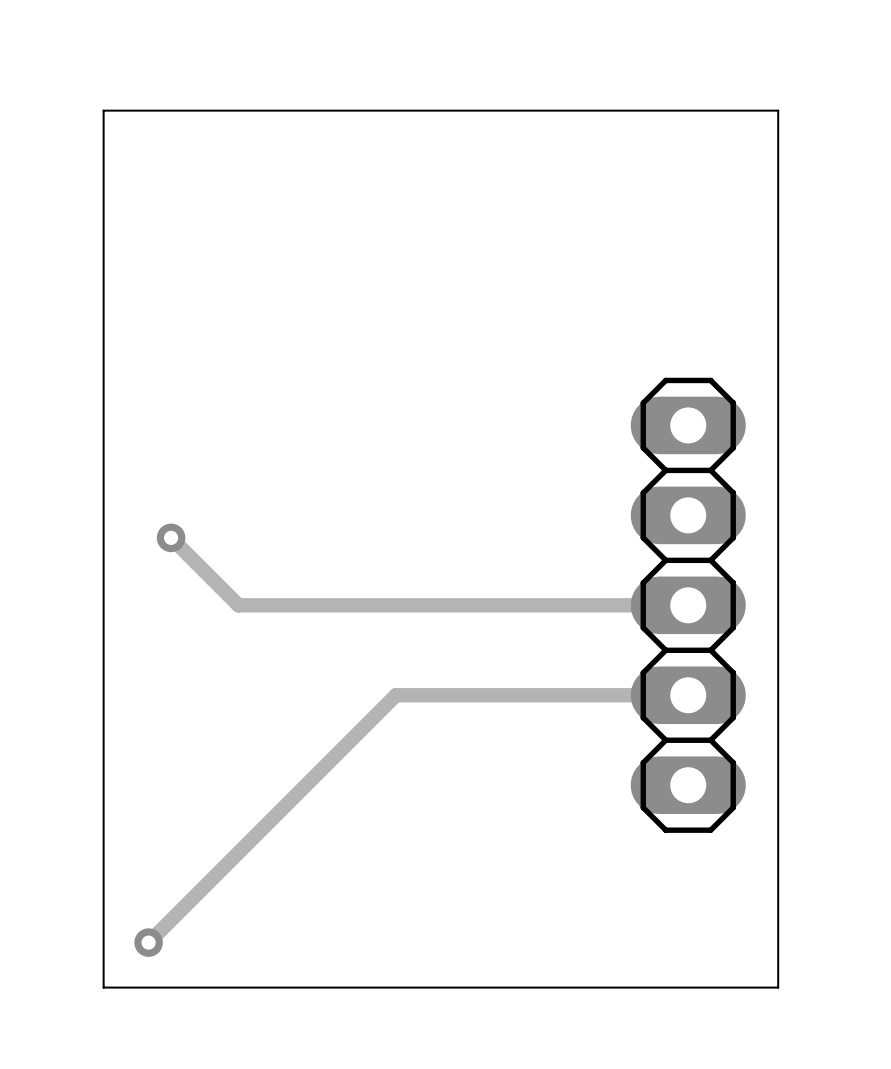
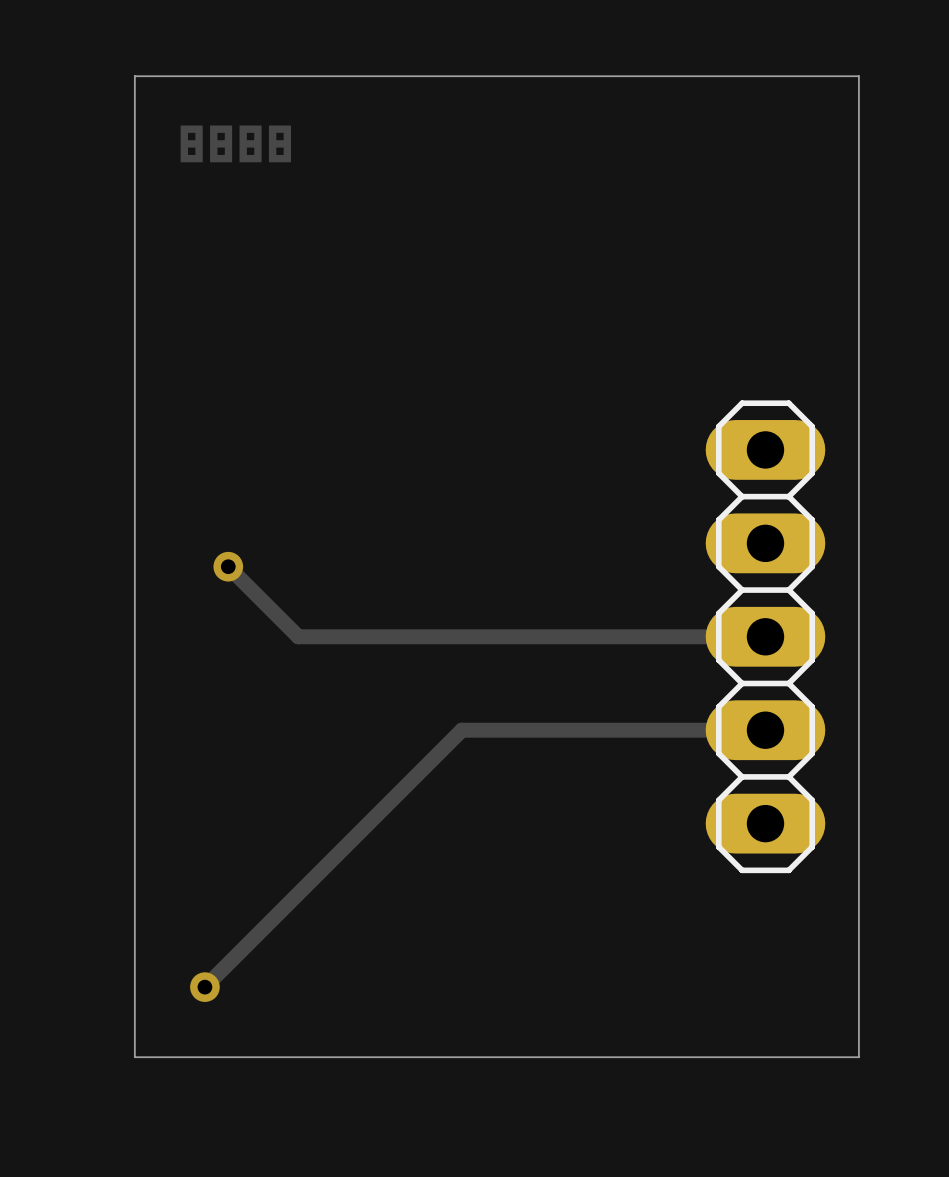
board edge: (778, 110) (103, 110) (103, 987) (778, 987) -> (858, 122) (858, 76) (134, 76) (134, 1057) (858, 1057) (858, 1033)
drawing: none -> [180, 125, 292, 163]

